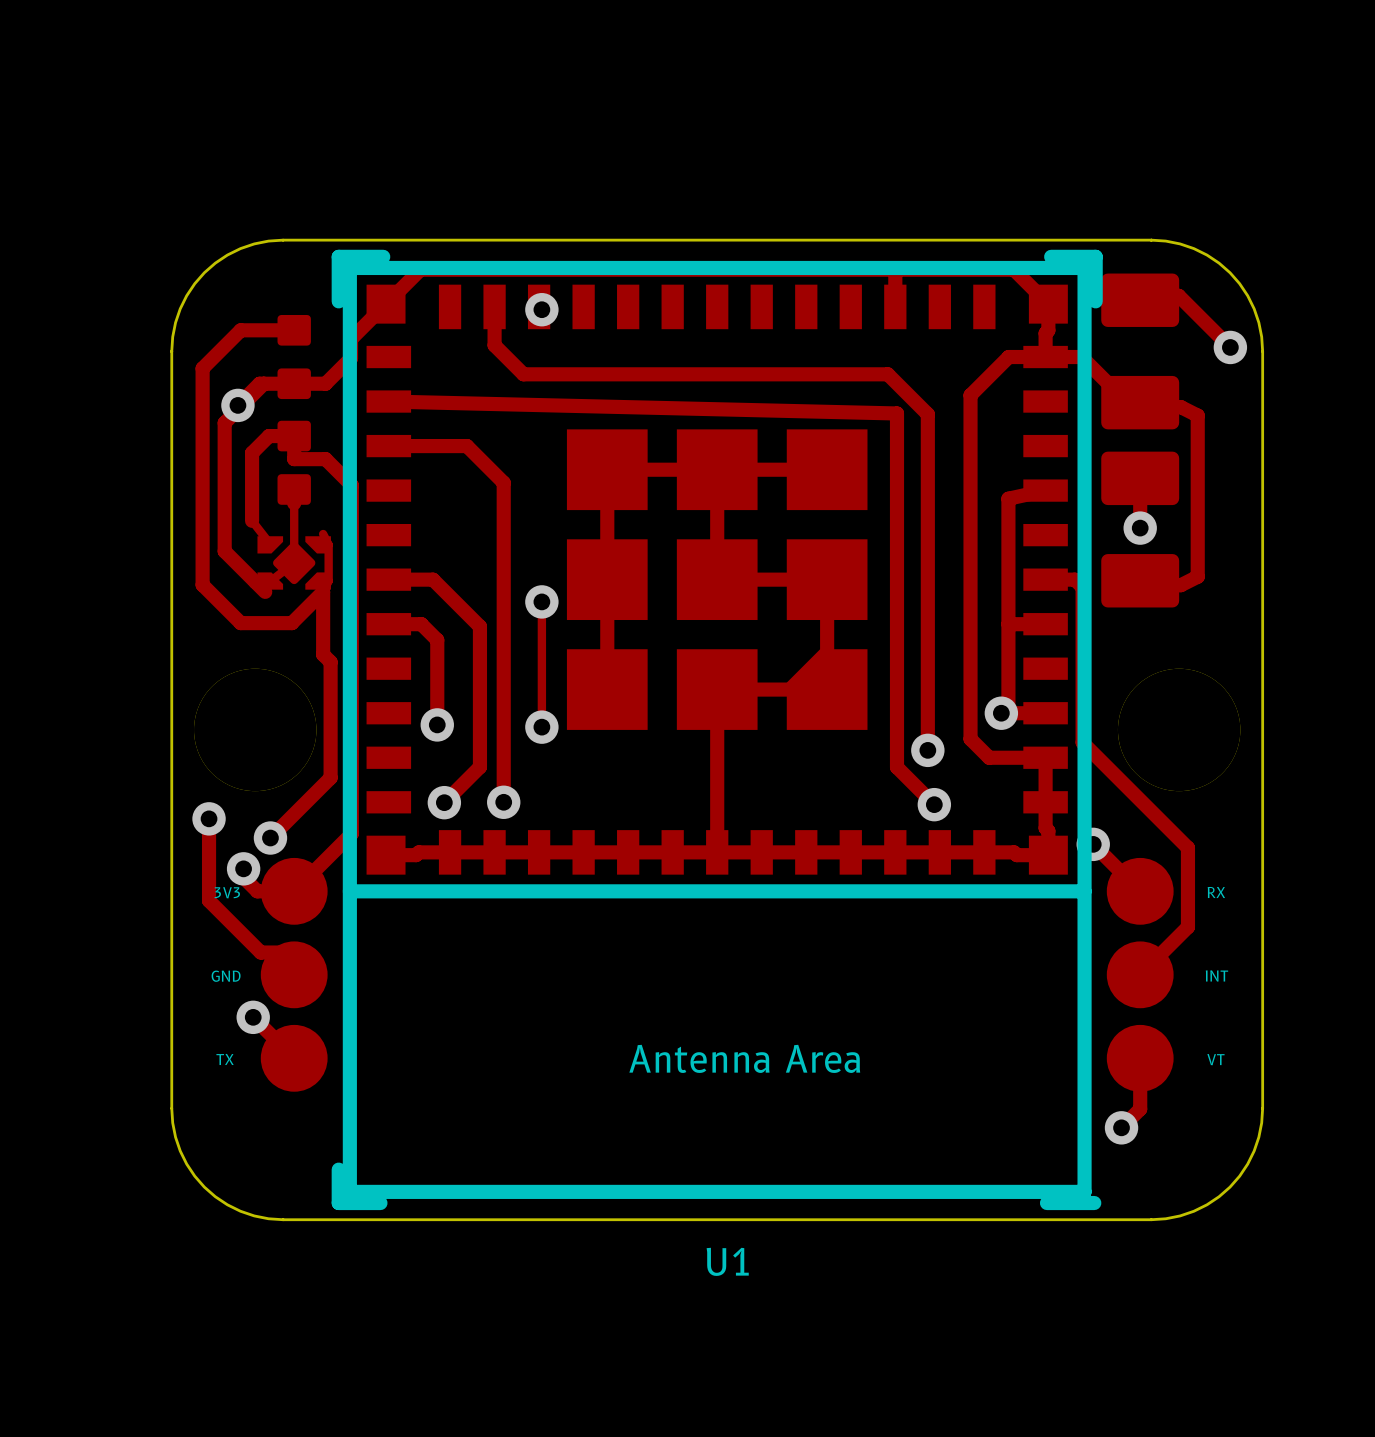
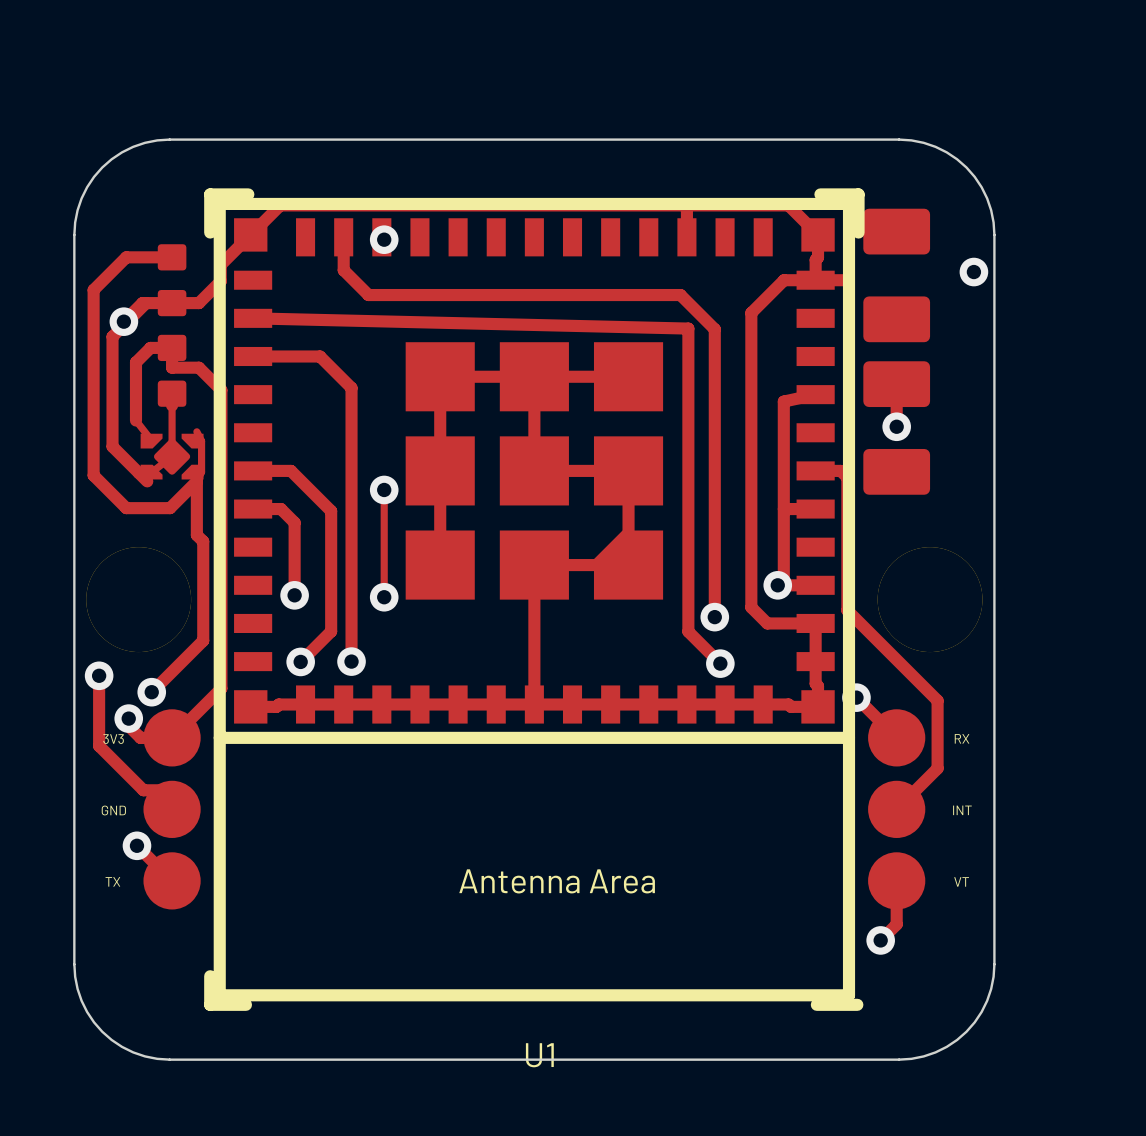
board edge: (283, 240) (1151, 240) (1180, 243) (1193, 248) (1219, 263) (1230, 272) (1239, 283) (1254, 308) (1261, 336) (1262, 351) (1262, 1108) (1258, 1137) (1254, 1151) (1247, 1164) (1230, 1187) (1219, 1196) (1193, 1211) (1165, 1218) (1151, 1219) (283, 1219) (254, 1215) (240, 1211) (215, 1196) (204, 1187) (194, 1176) (180, 1151) (175, 1137) (171, 1108) (172, 336) (180, 308) (186, 295) (194, 283) (215, 263) (240, 248) (254, 243) (283, 240) -> (169, 139) (145, 142) (133, 146) (111, 159) (102, 167) (87, 187) (81, 198) (75, 222) (74, 964) (77, 988) (81, 1000) (94, 1022) (102, 1031) (122, 1046) (133, 1052) (157, 1058) (169, 1059) (899, 1059) (911, 1058) (935, 1052) (957, 1039) (966, 1031) (981, 1011) (987, 1000) (991, 988) (994, 964) (994, 234) (991, 210) (987, 198) (981, 187) (966, 167) (957, 159) (935, 146) (923, 142) (899, 139) (169, 139)
track: (1140, 295) (1178, 295) (1230, 347) -> none
track: (1081, 357) (1131, 407) (1180, 407) (1197, 415) (1197, 576) (1180, 585) (1140, 585) -> none

